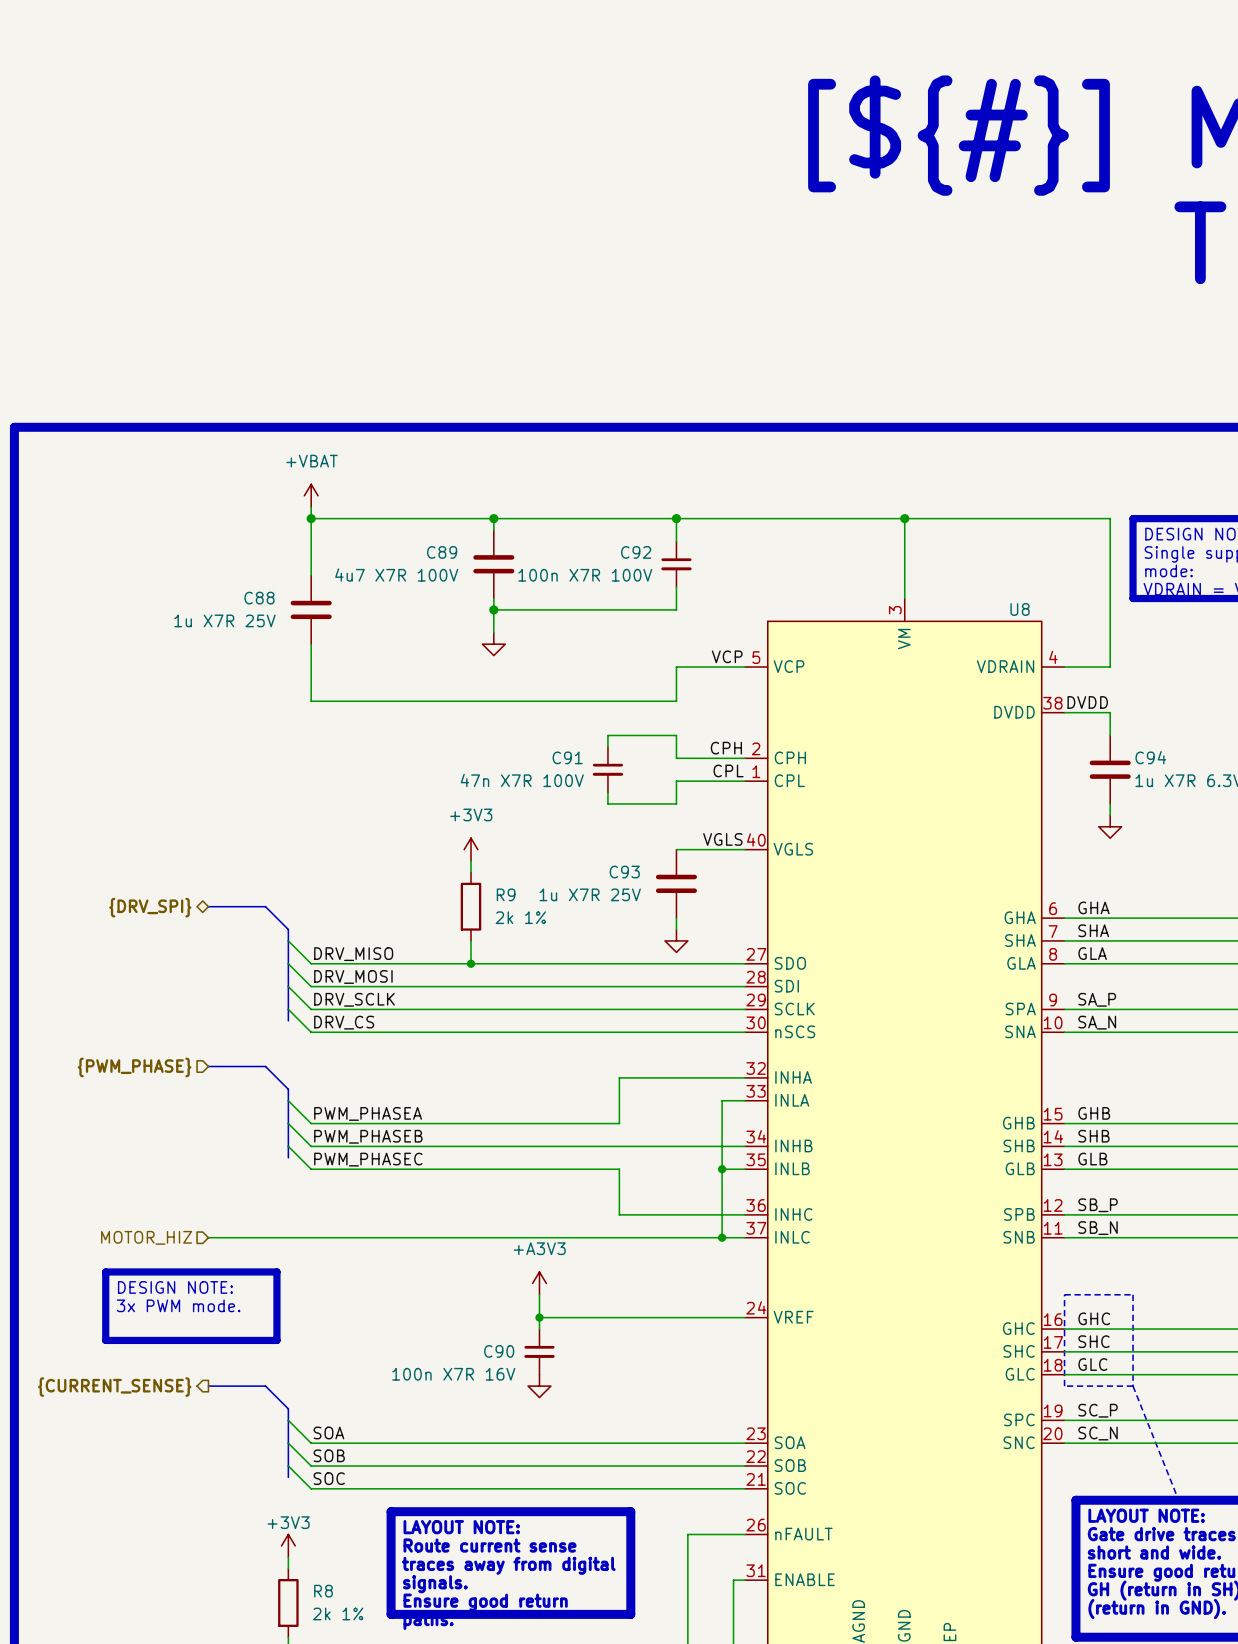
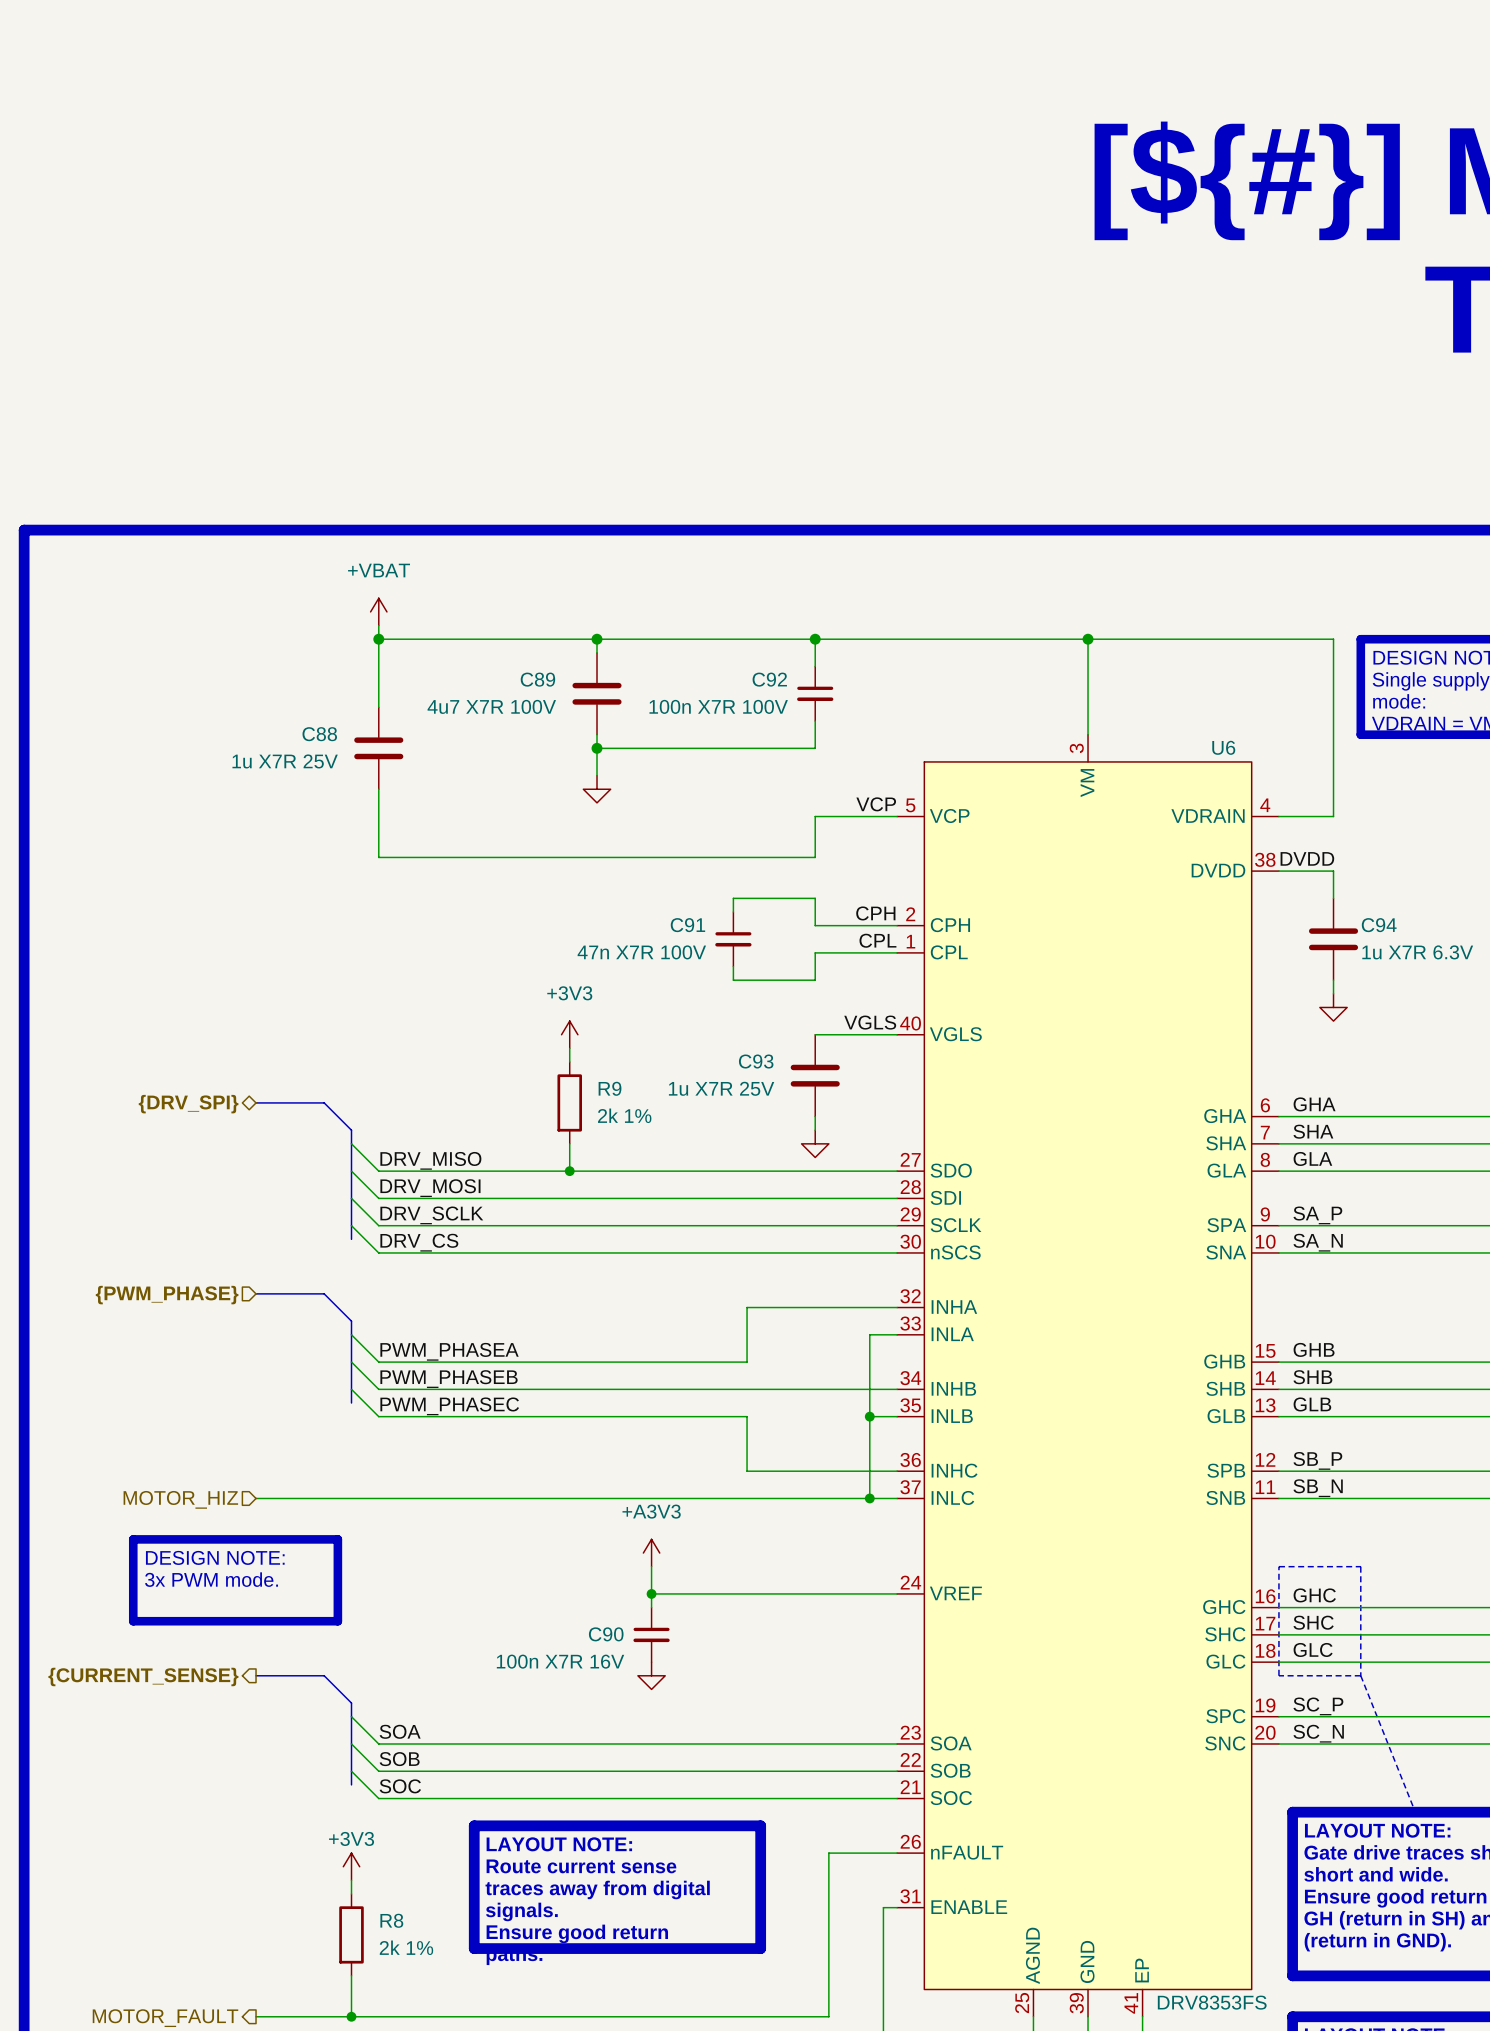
U8 name: U8 (1020, 609) -> U6 (1223, 747)

